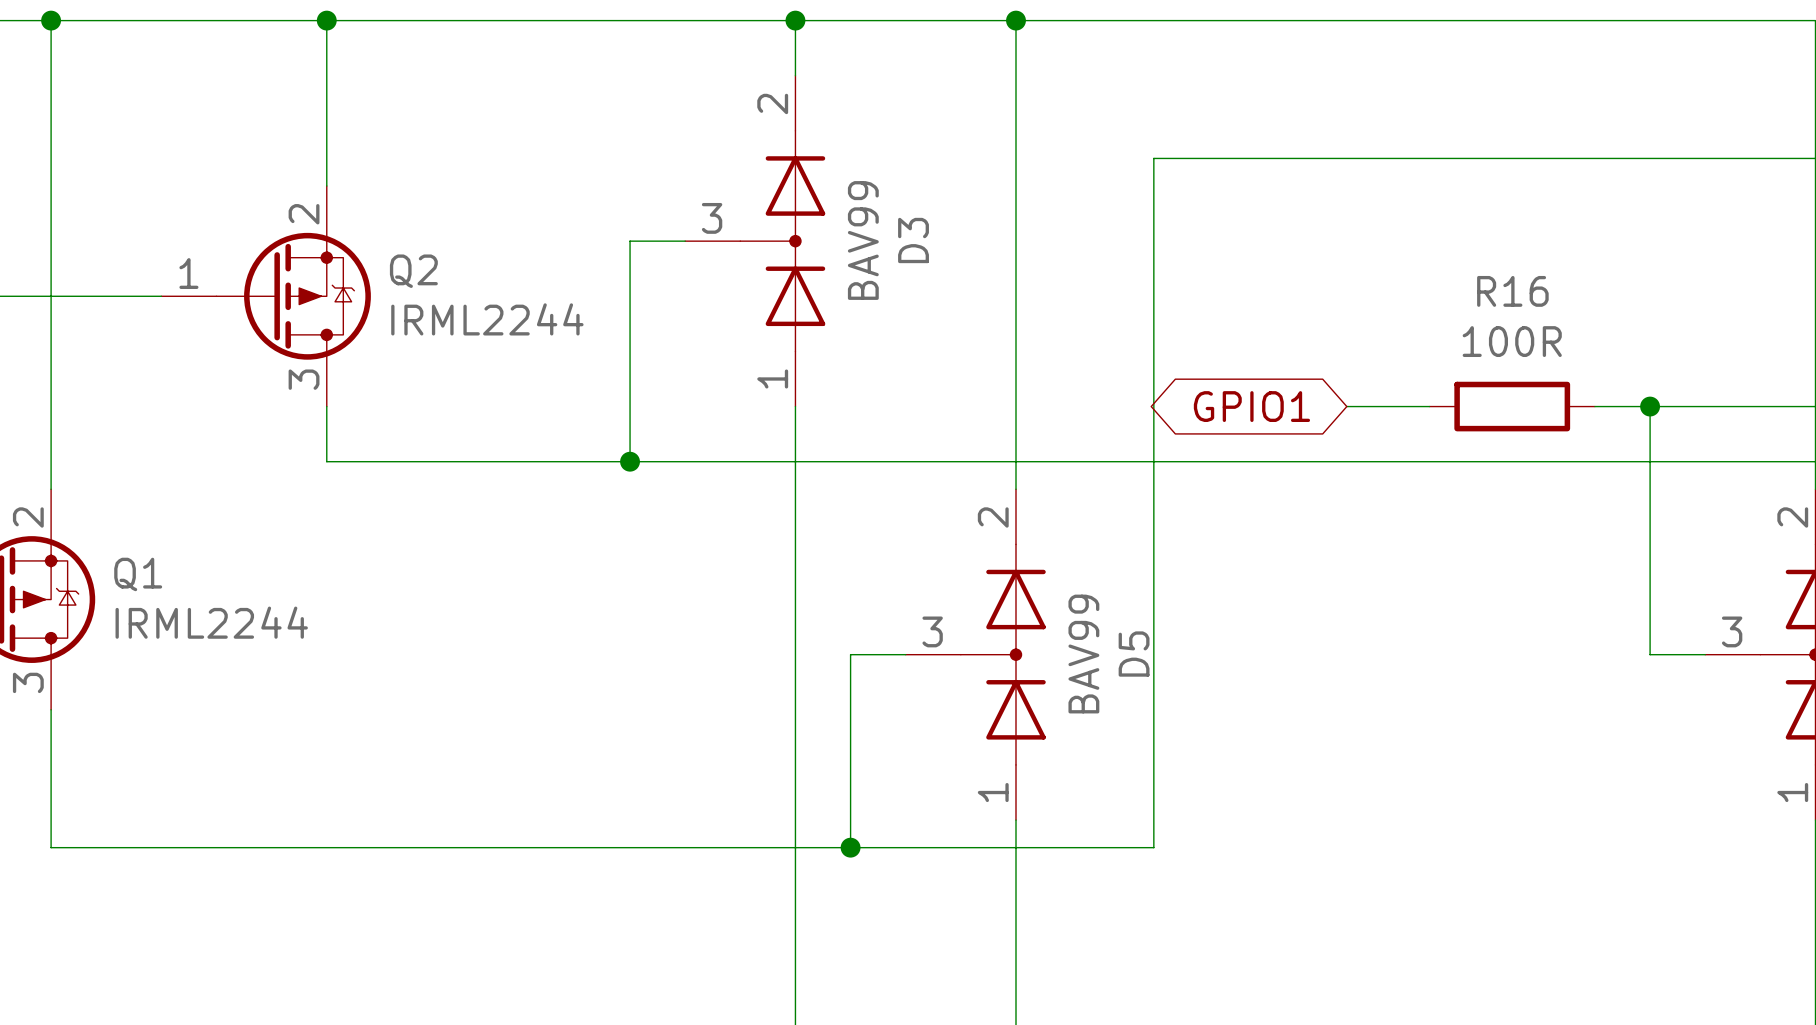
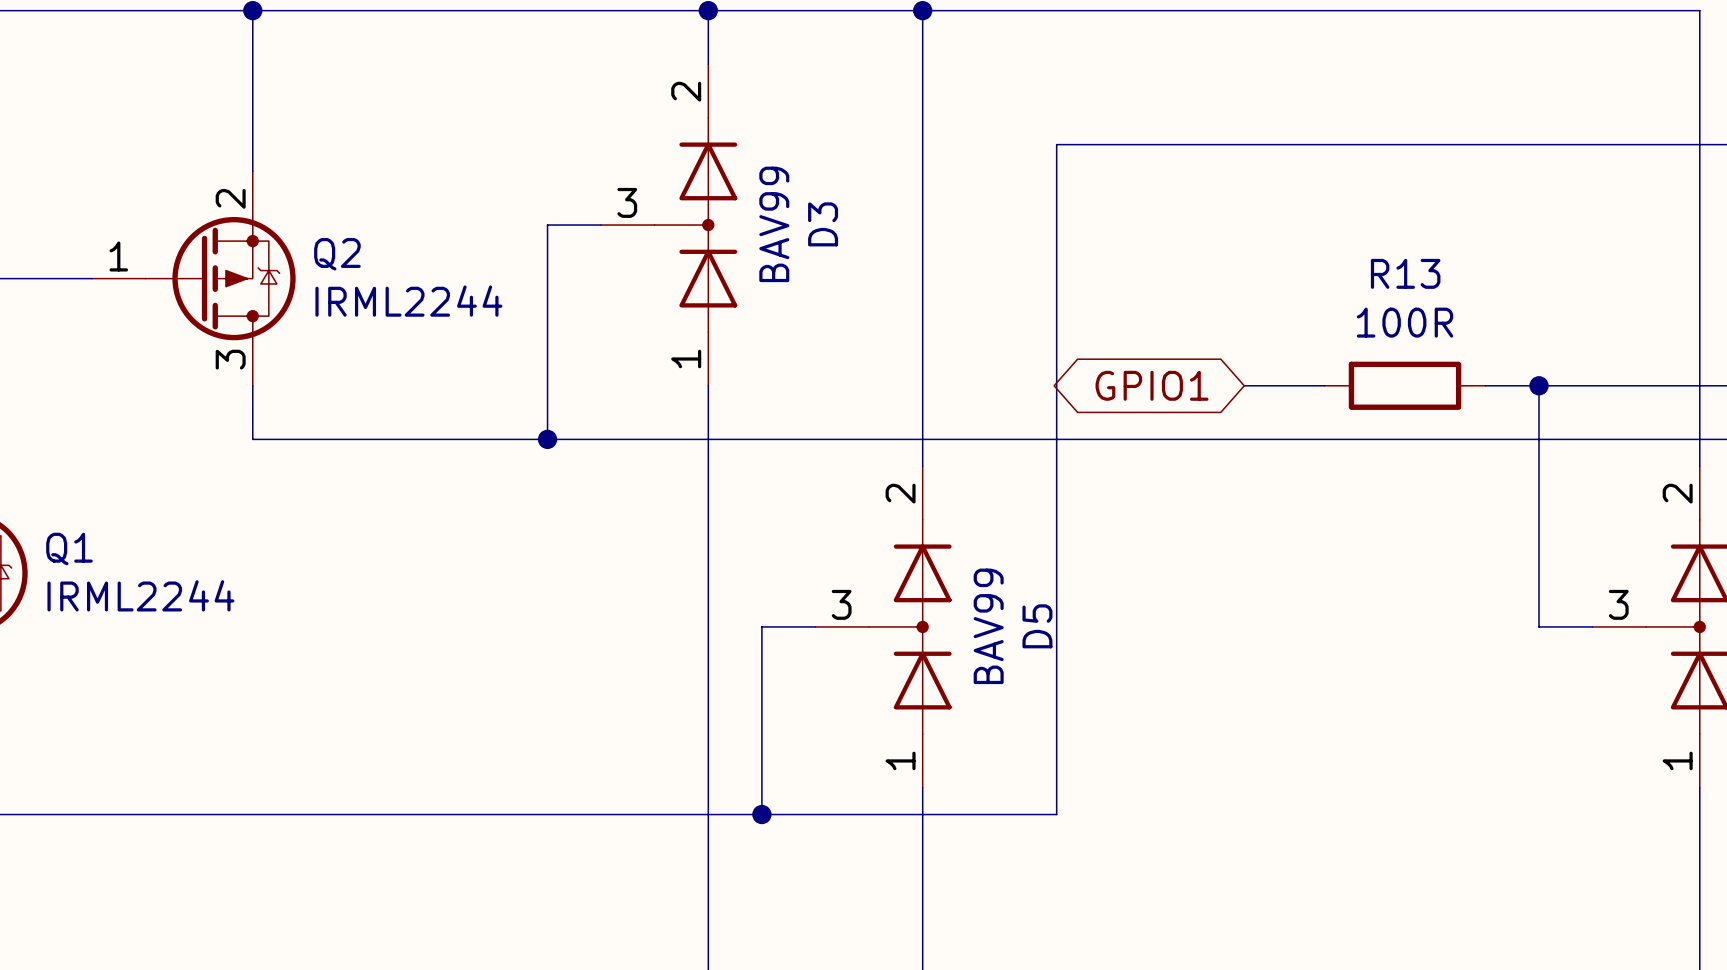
R16 name: R16 (1512, 291) -> R13 (1405, 273)

